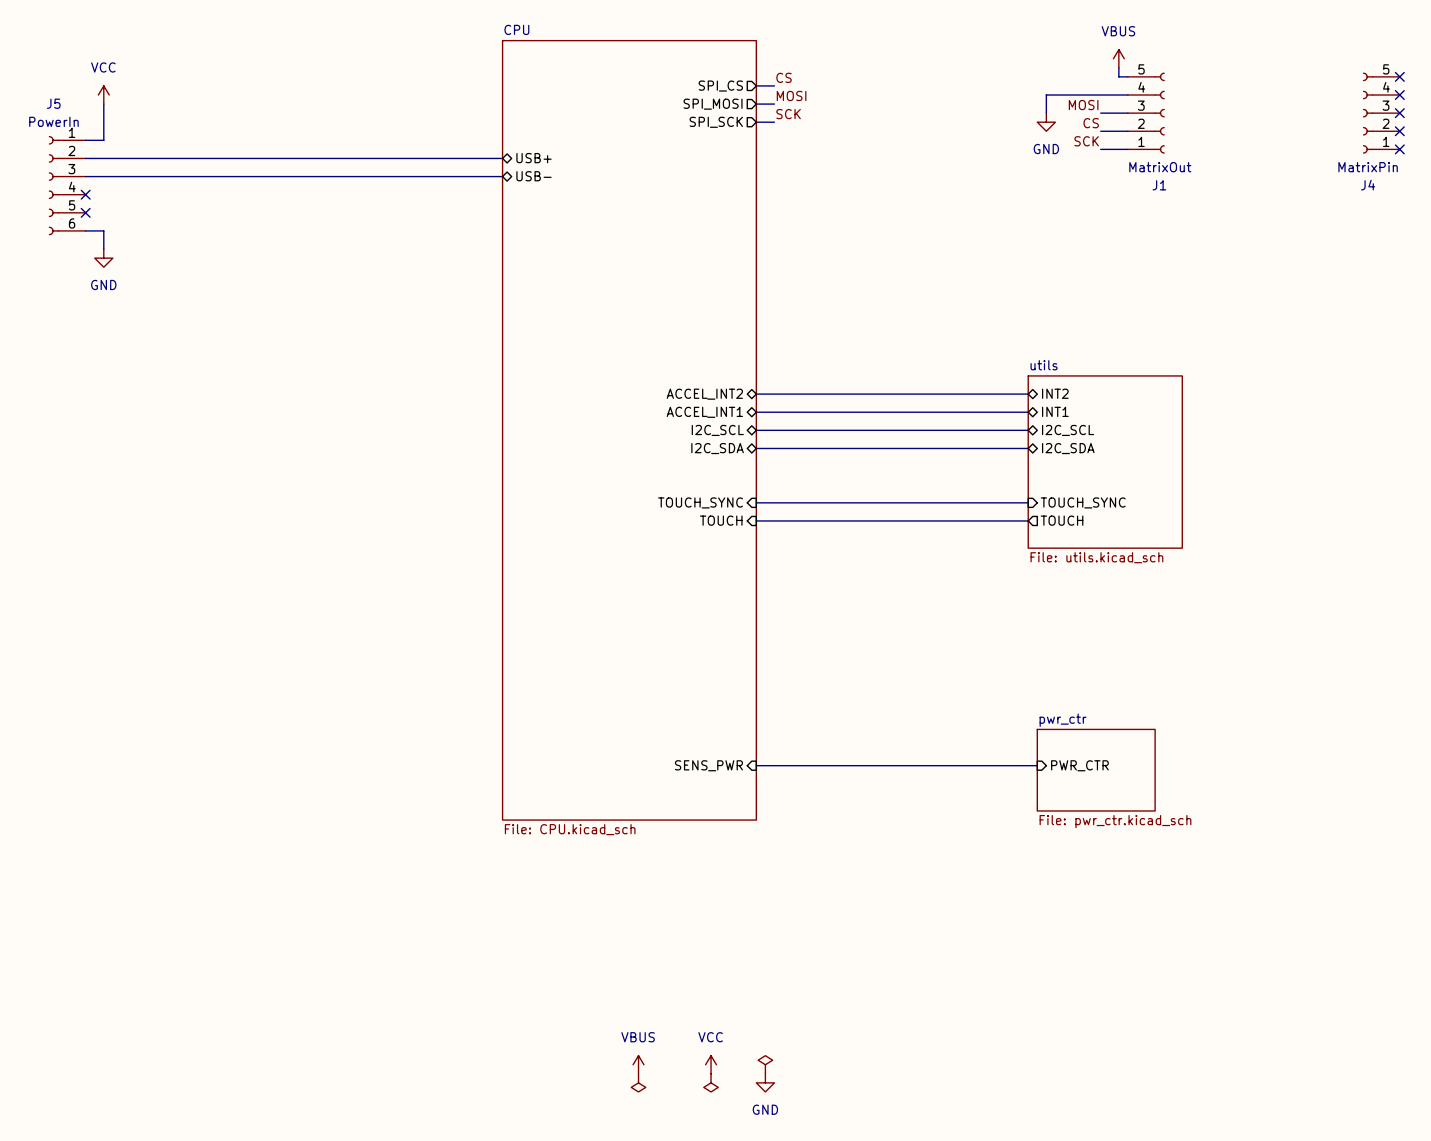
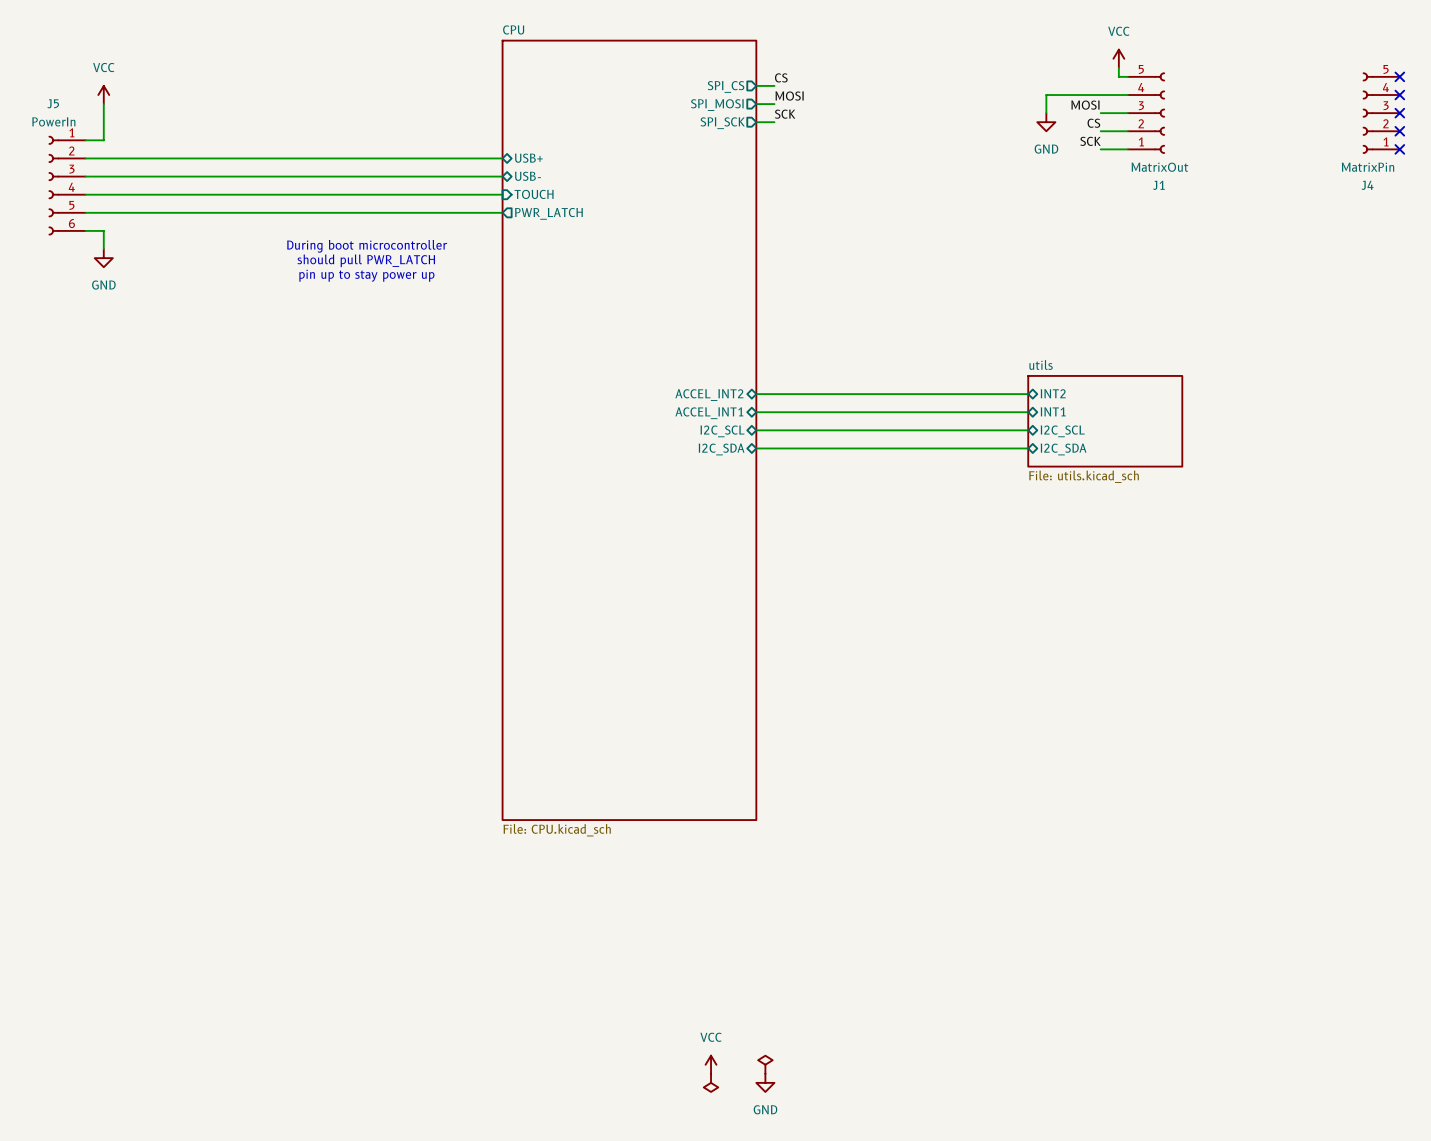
power symbol: VBUS (1118, 58) -> VCC (1118, 58)
wire: none -> (85, 194) (502, 194)
no-connect mark: (85, 194) -> none
sheet pin: none -> TOUCH (534, 194)
wire: none -> (85, 212) (502, 212)
no-connect mark: (85, 212) -> none
sheet pin: none -> PWR_LATCH (548, 213)
text: none -> During boot microcontroller (367, 246)
text: none -> should pull PWR_LATCH (366, 260)
text: none -> pin up to stay power up (366, 275)
sheet utils: none -> File: utils.kicad_sch (1105, 421)
sheet utils: File: utils.kicad_sch (1105, 462) -> none
sheet pin: TOUCH_SYNC (700, 502) -> none
wire: (756, 502) (1028, 502) -> none
sheet pin: TOUCH_SYNC (1083, 502) -> none
sheet pin: TOUCH (721, 520) -> none
wire: (756, 520) (1028, 520) -> none
sheet pin: TOUCH (1062, 520) -> none
sheet pin: SENS_PWR (708, 765) -> none
wire: (756, 765) (1037, 765) -> none
sheet pin: PWR_CTR (1079, 765) -> none
sheet pwr_ctr: File: pwr_ctr.kicad_sch (1096, 770) -> none
power symbol: VBUS (638, 1064) -> none
power symbol: (638, 1082) -> none

